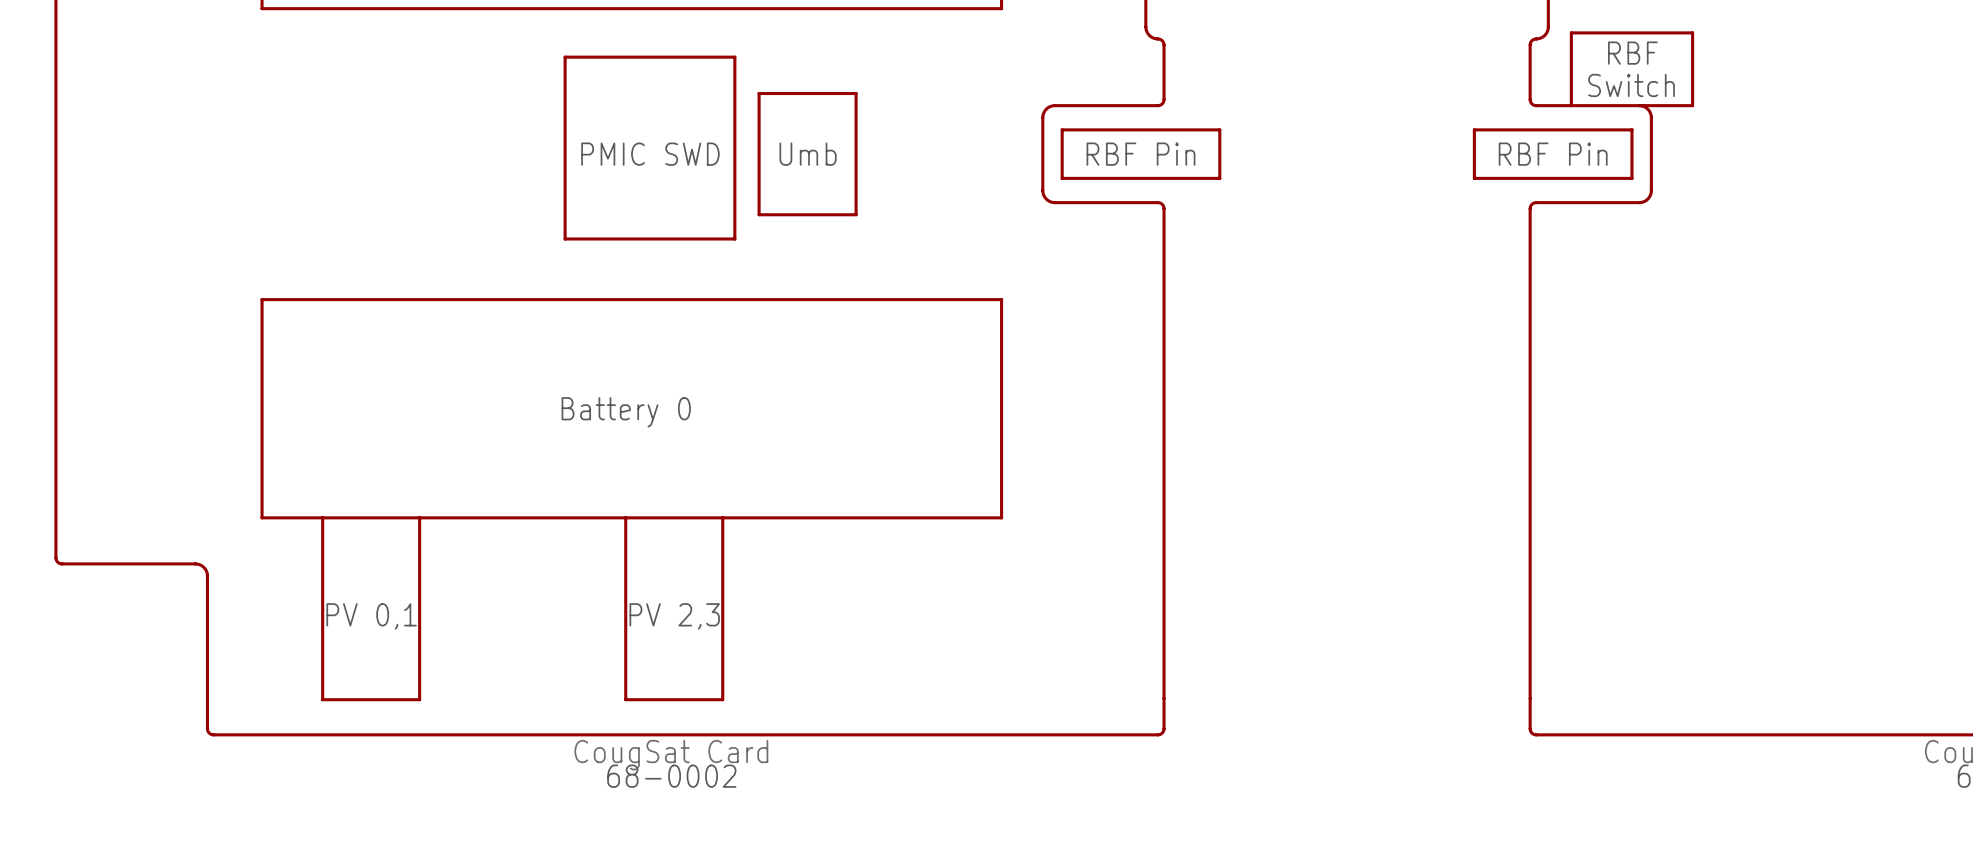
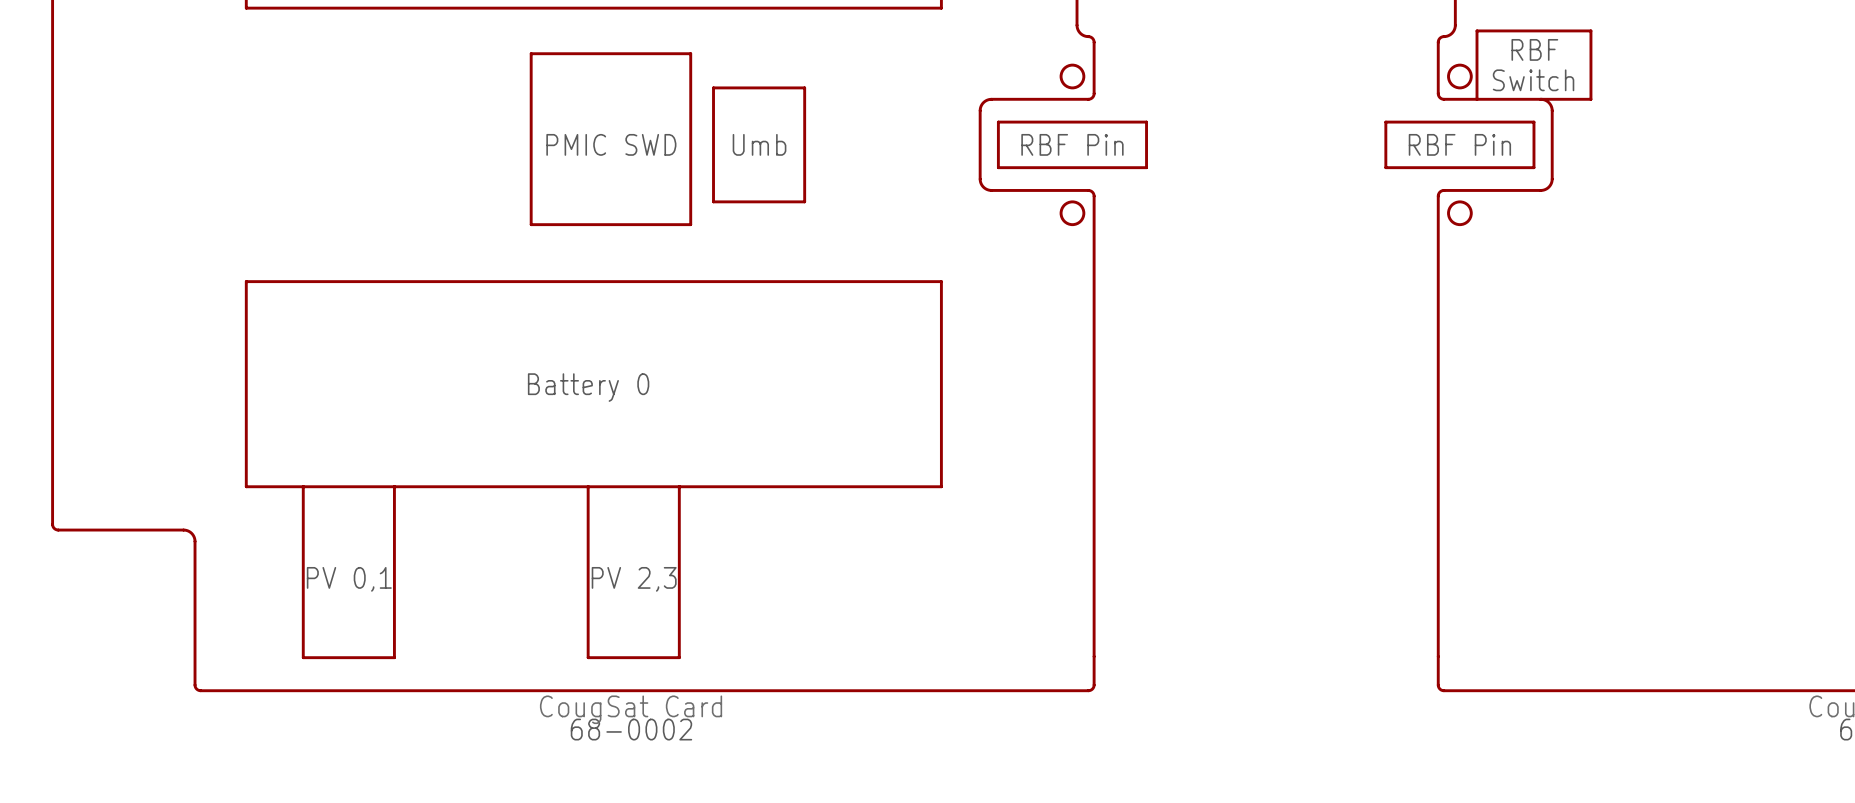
drawing: none -> [1059, 63, 1086, 90]
drawing: none -> [1447, 63, 1473, 90]
drawing: none -> [1059, 200, 1086, 227]
drawing: none -> [1447, 200, 1473, 227]

